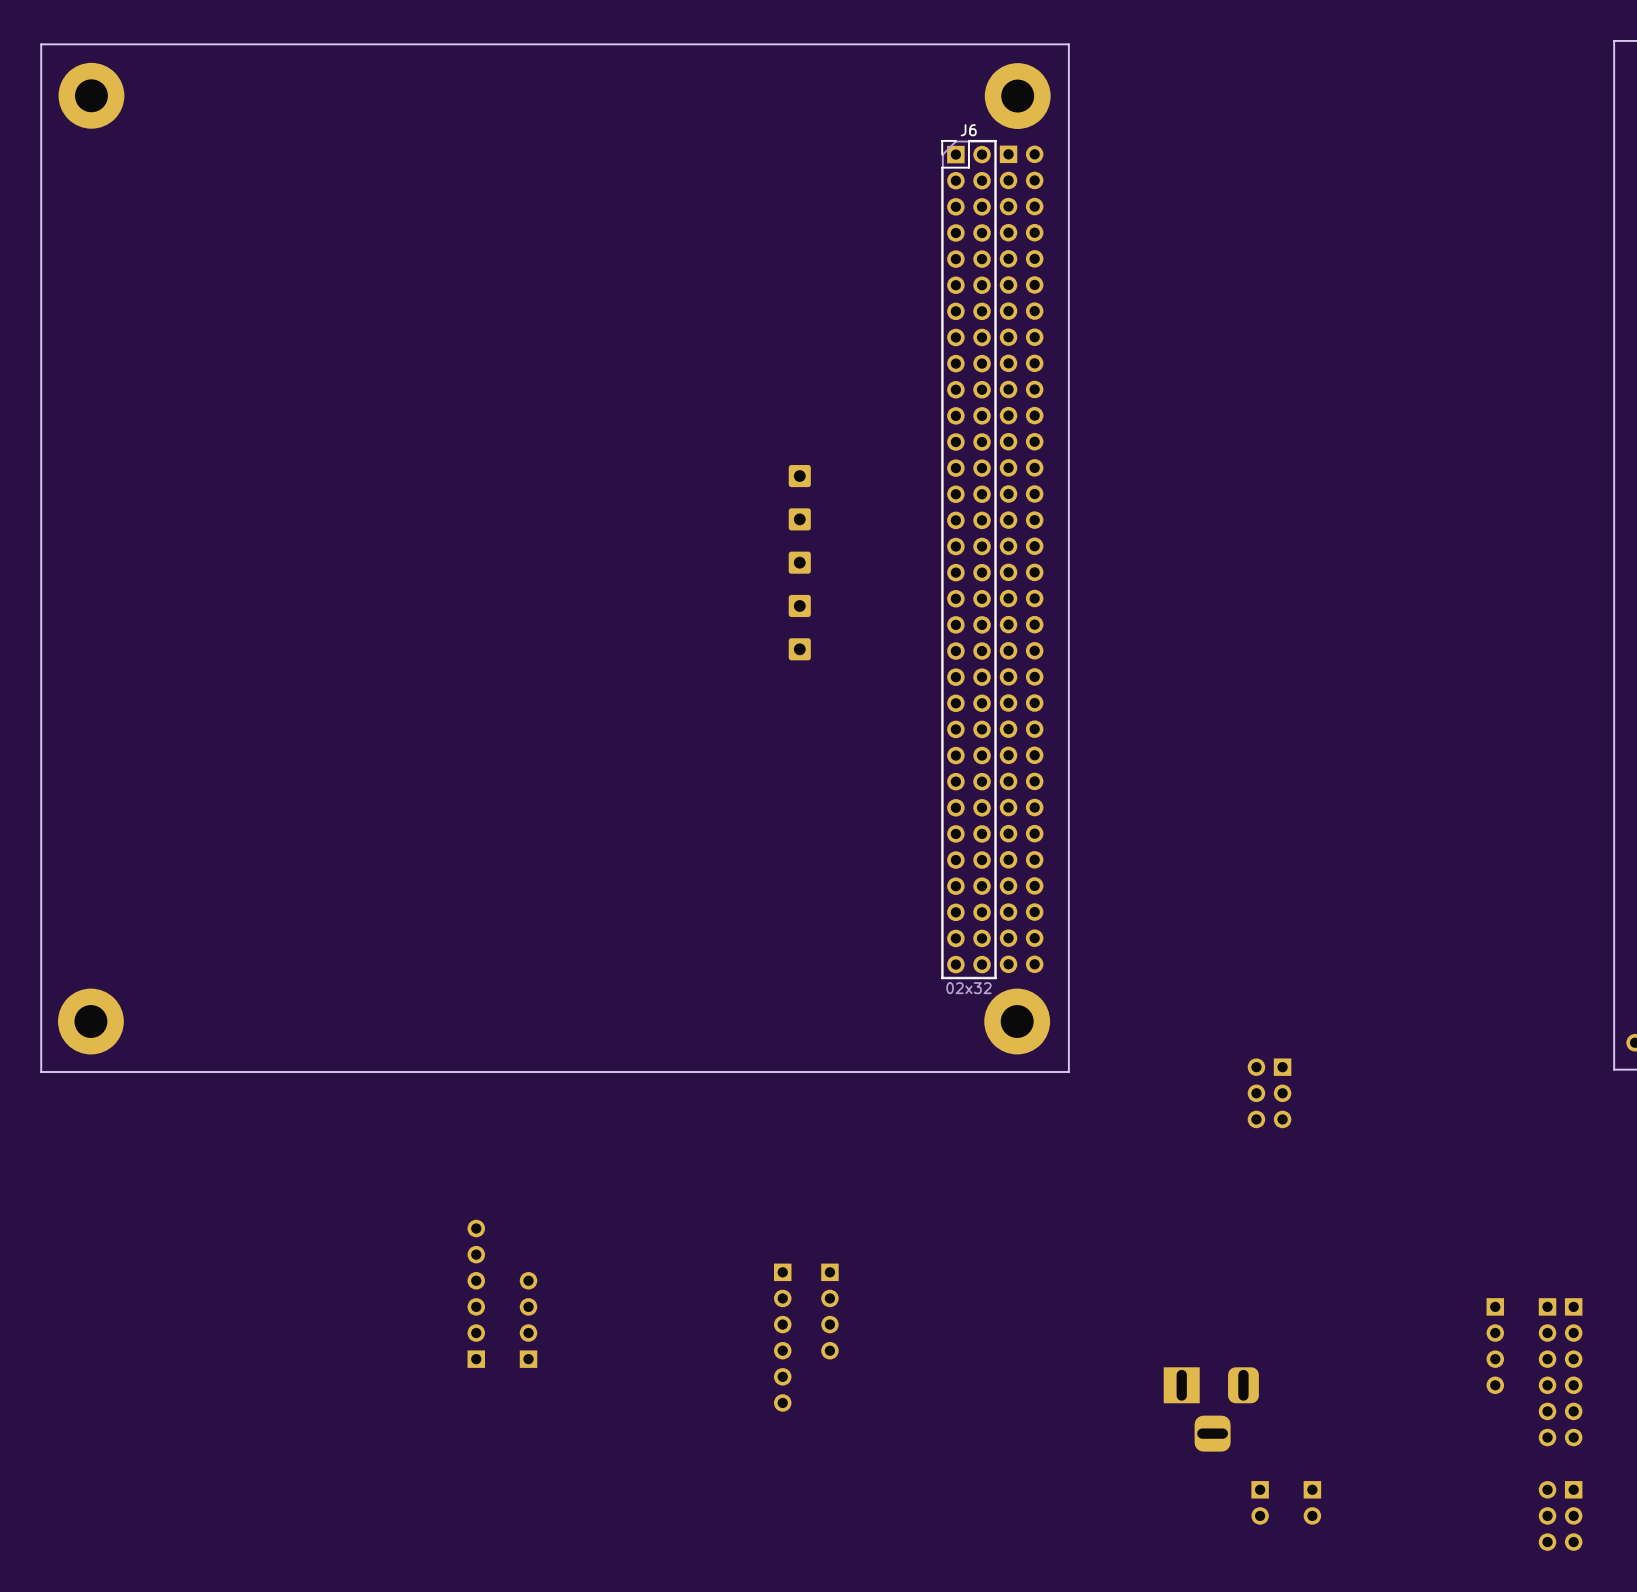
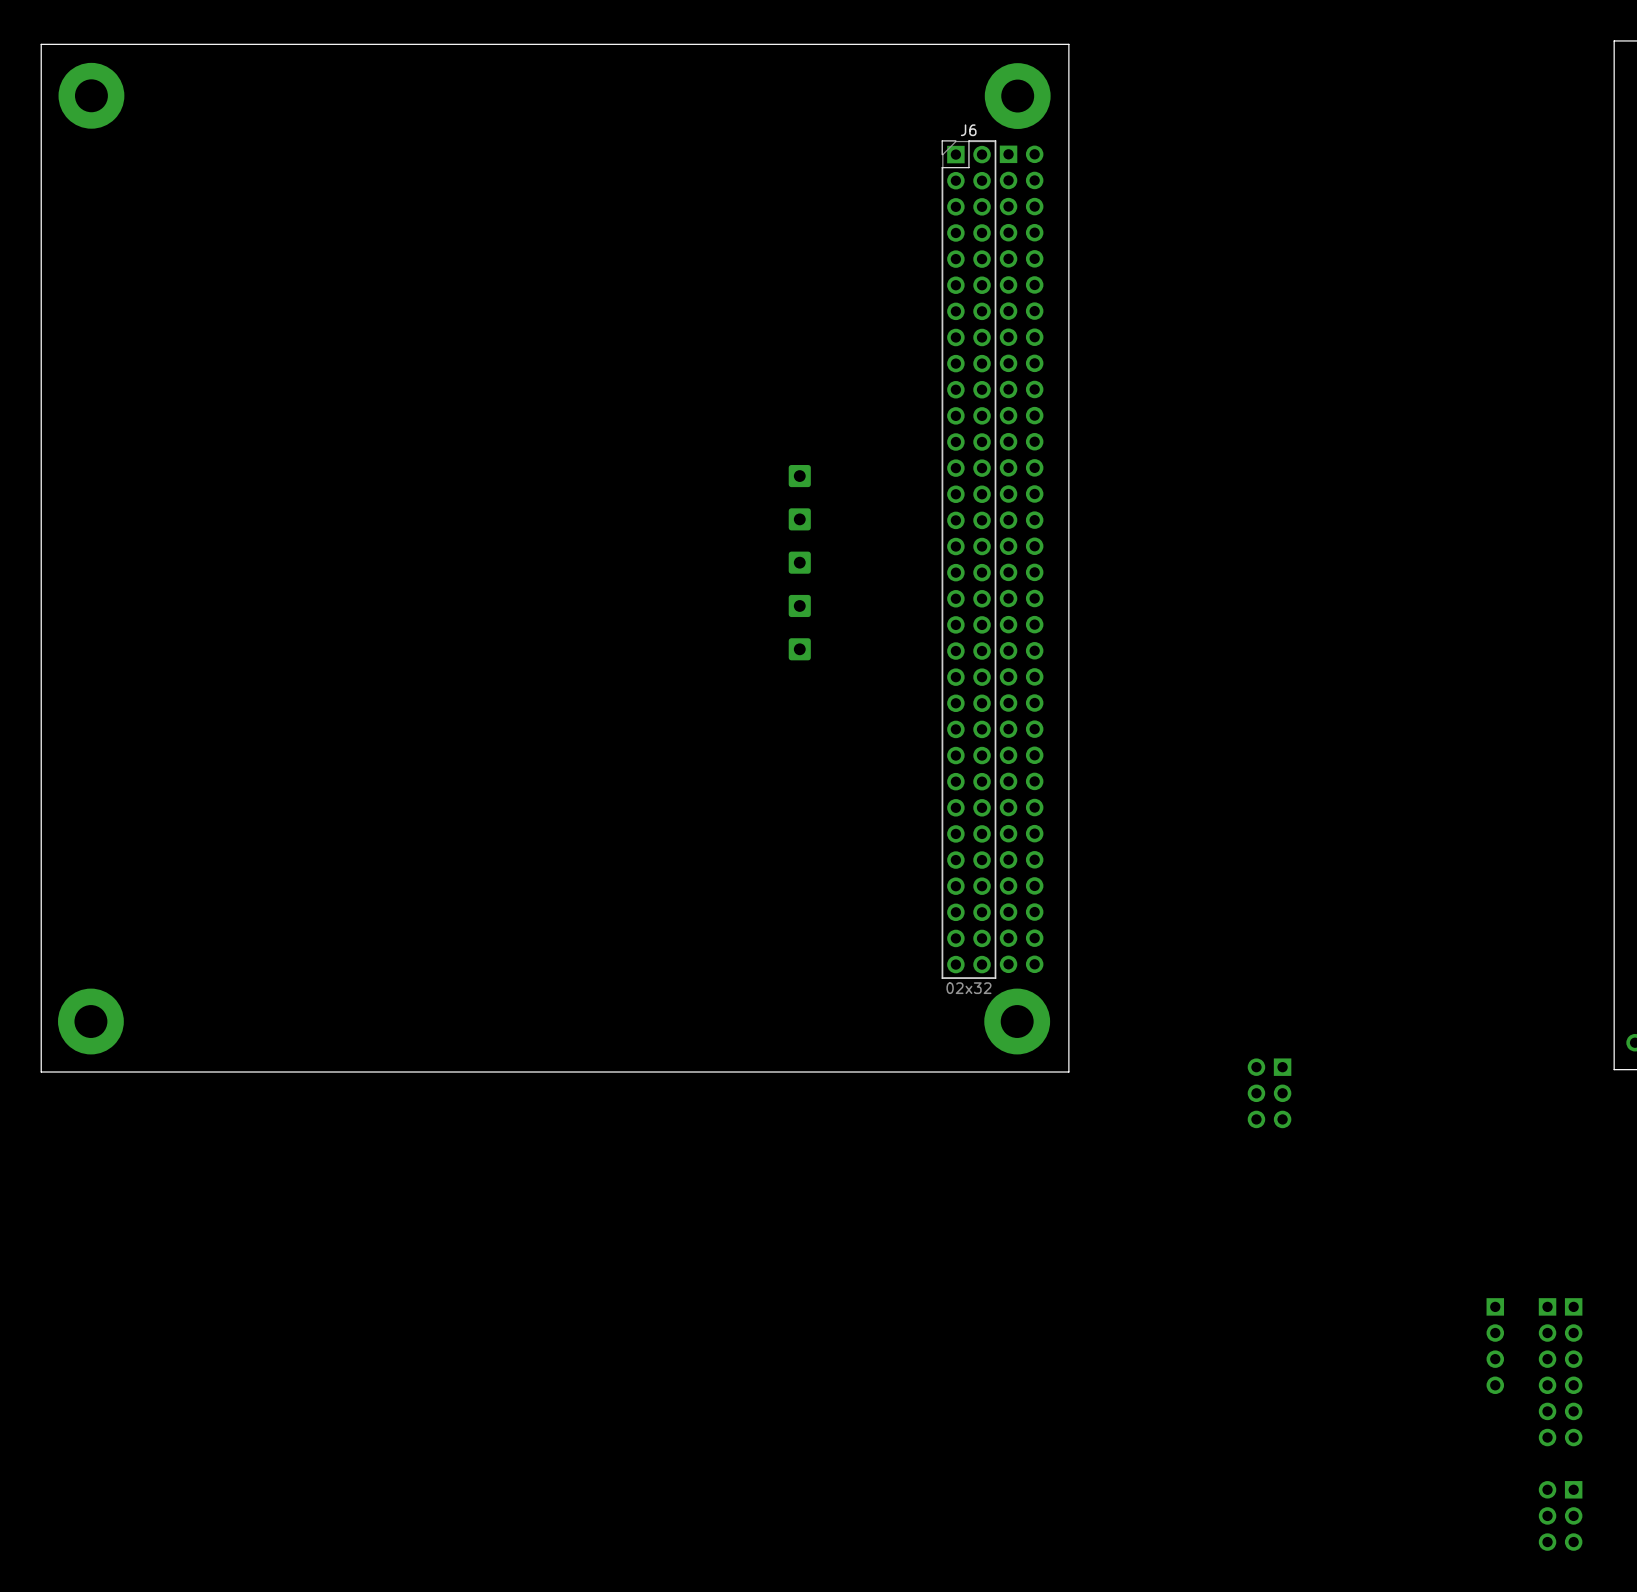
part: (476, 1293) -> none
part: (829, 1311) -> none
part: (528, 1319) -> none
part: (782, 1337) -> none
part: (1211, 1409) -> none
part: (1260, 1502) -> none
part: (1312, 1502) -> none

